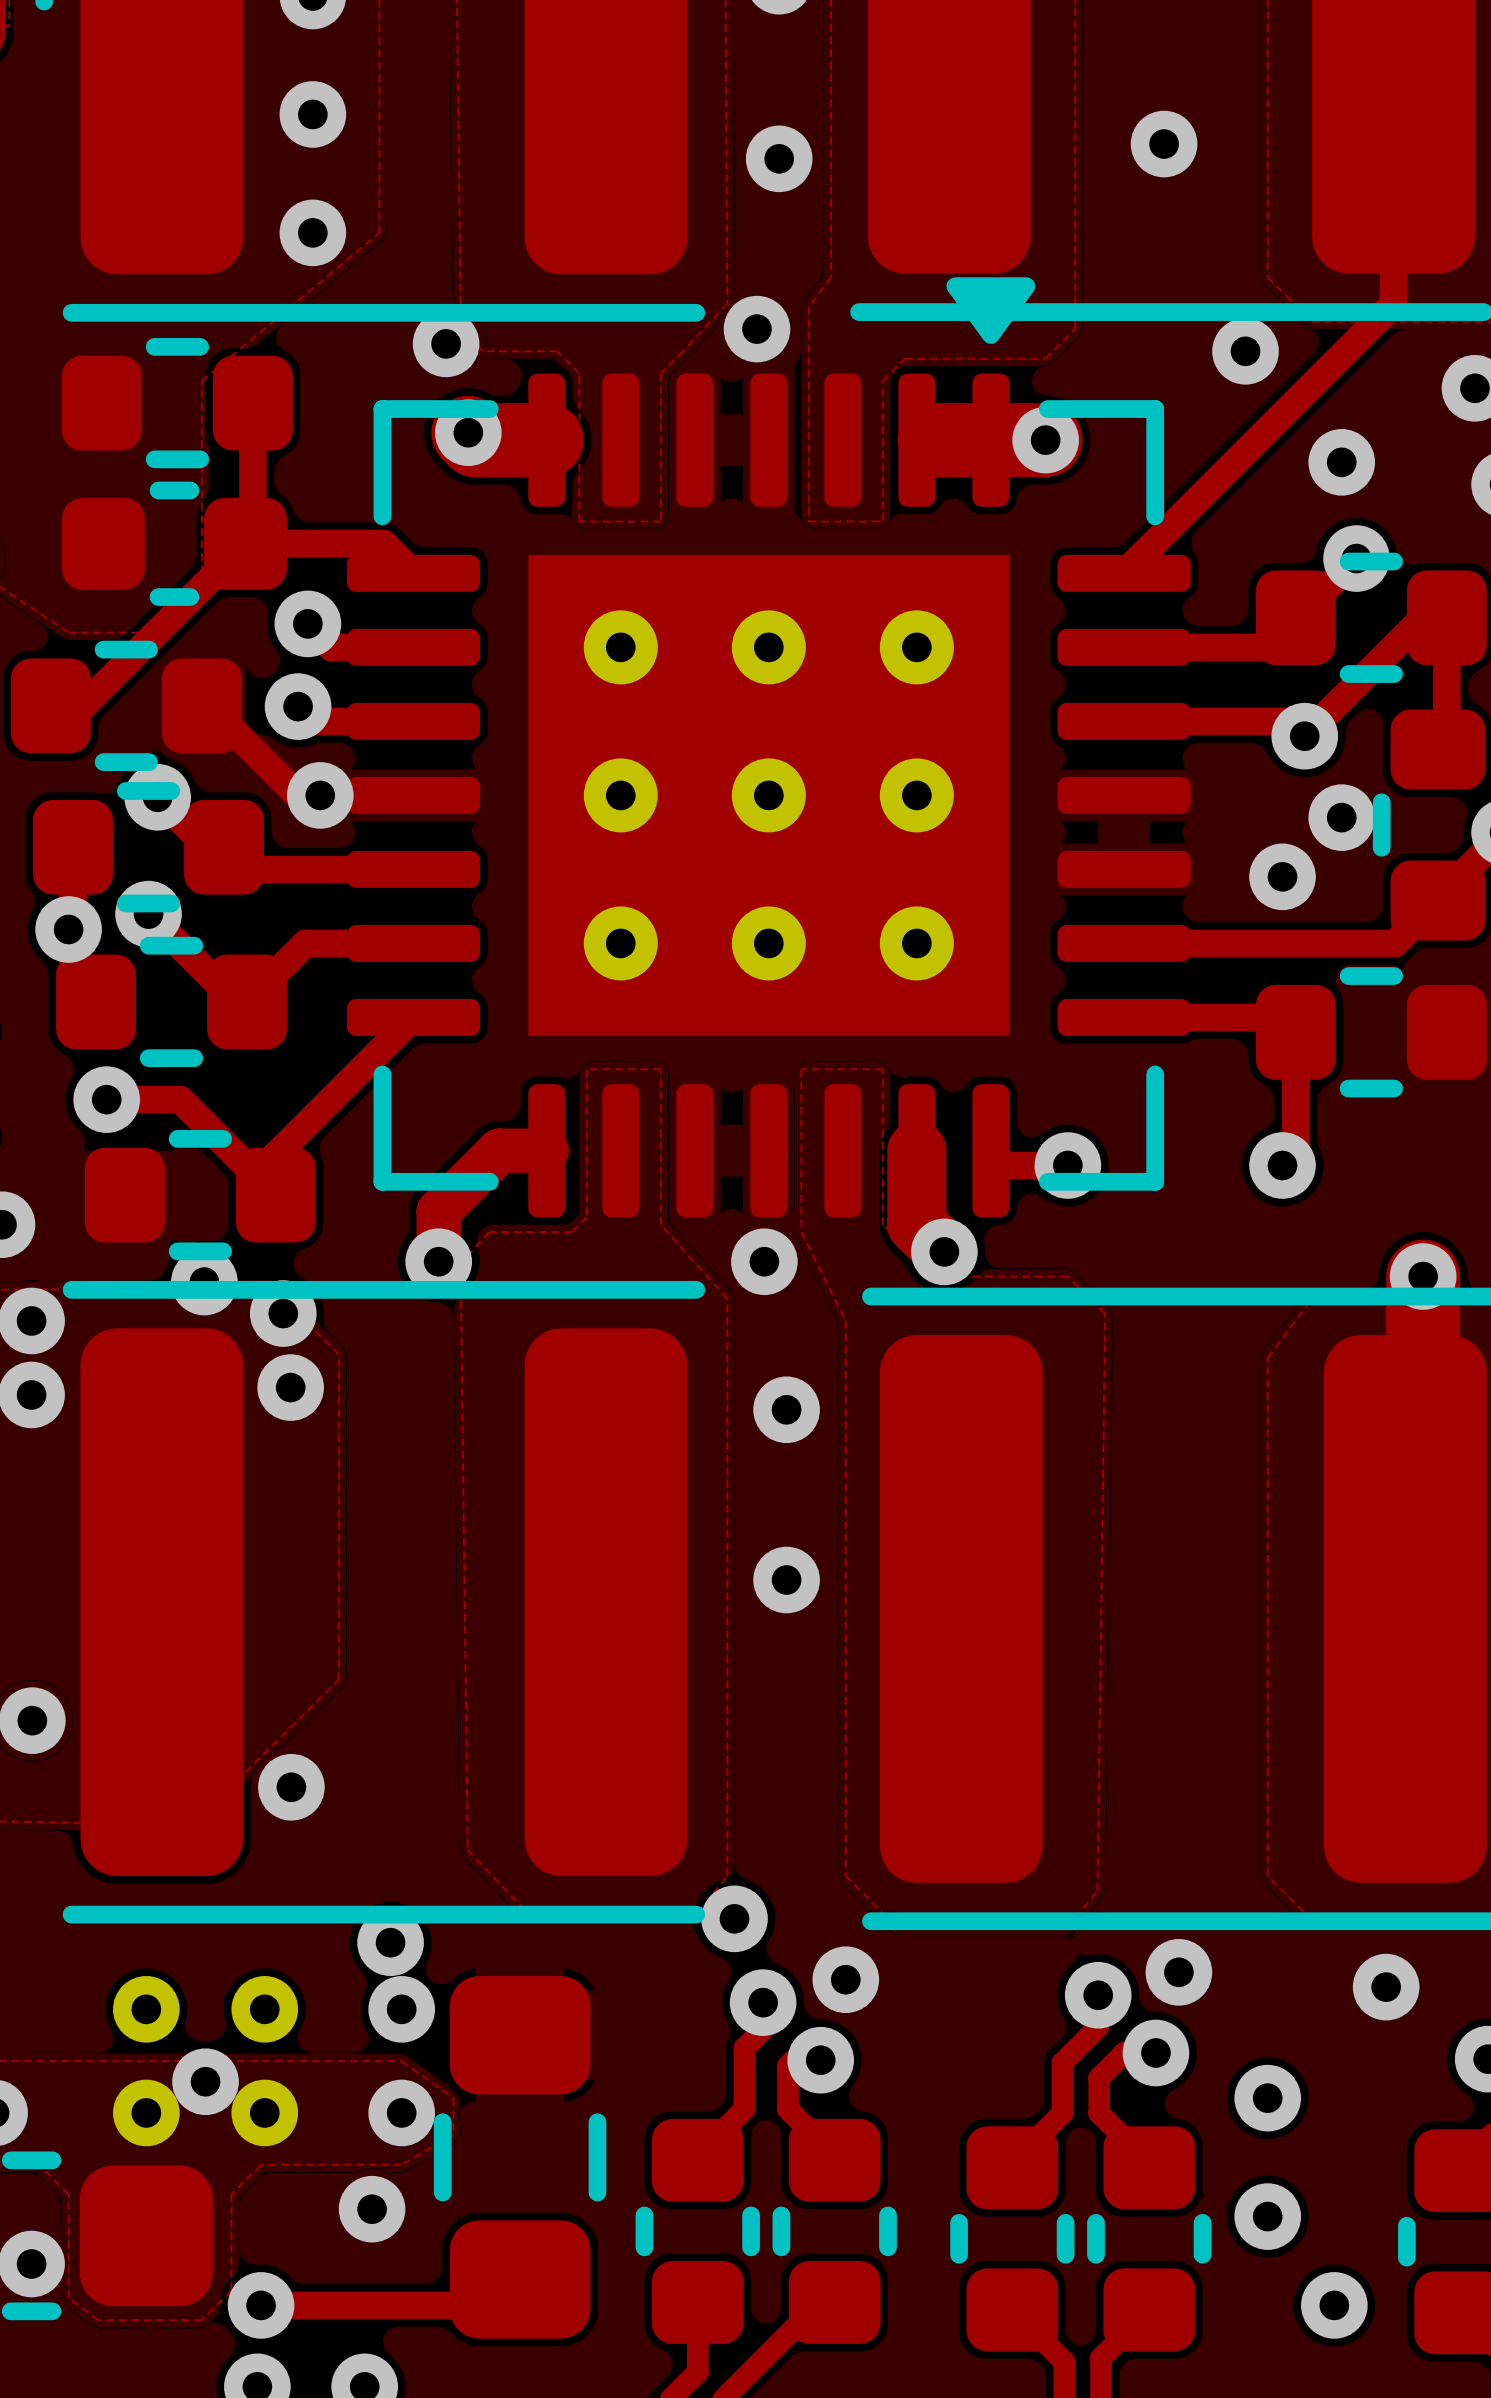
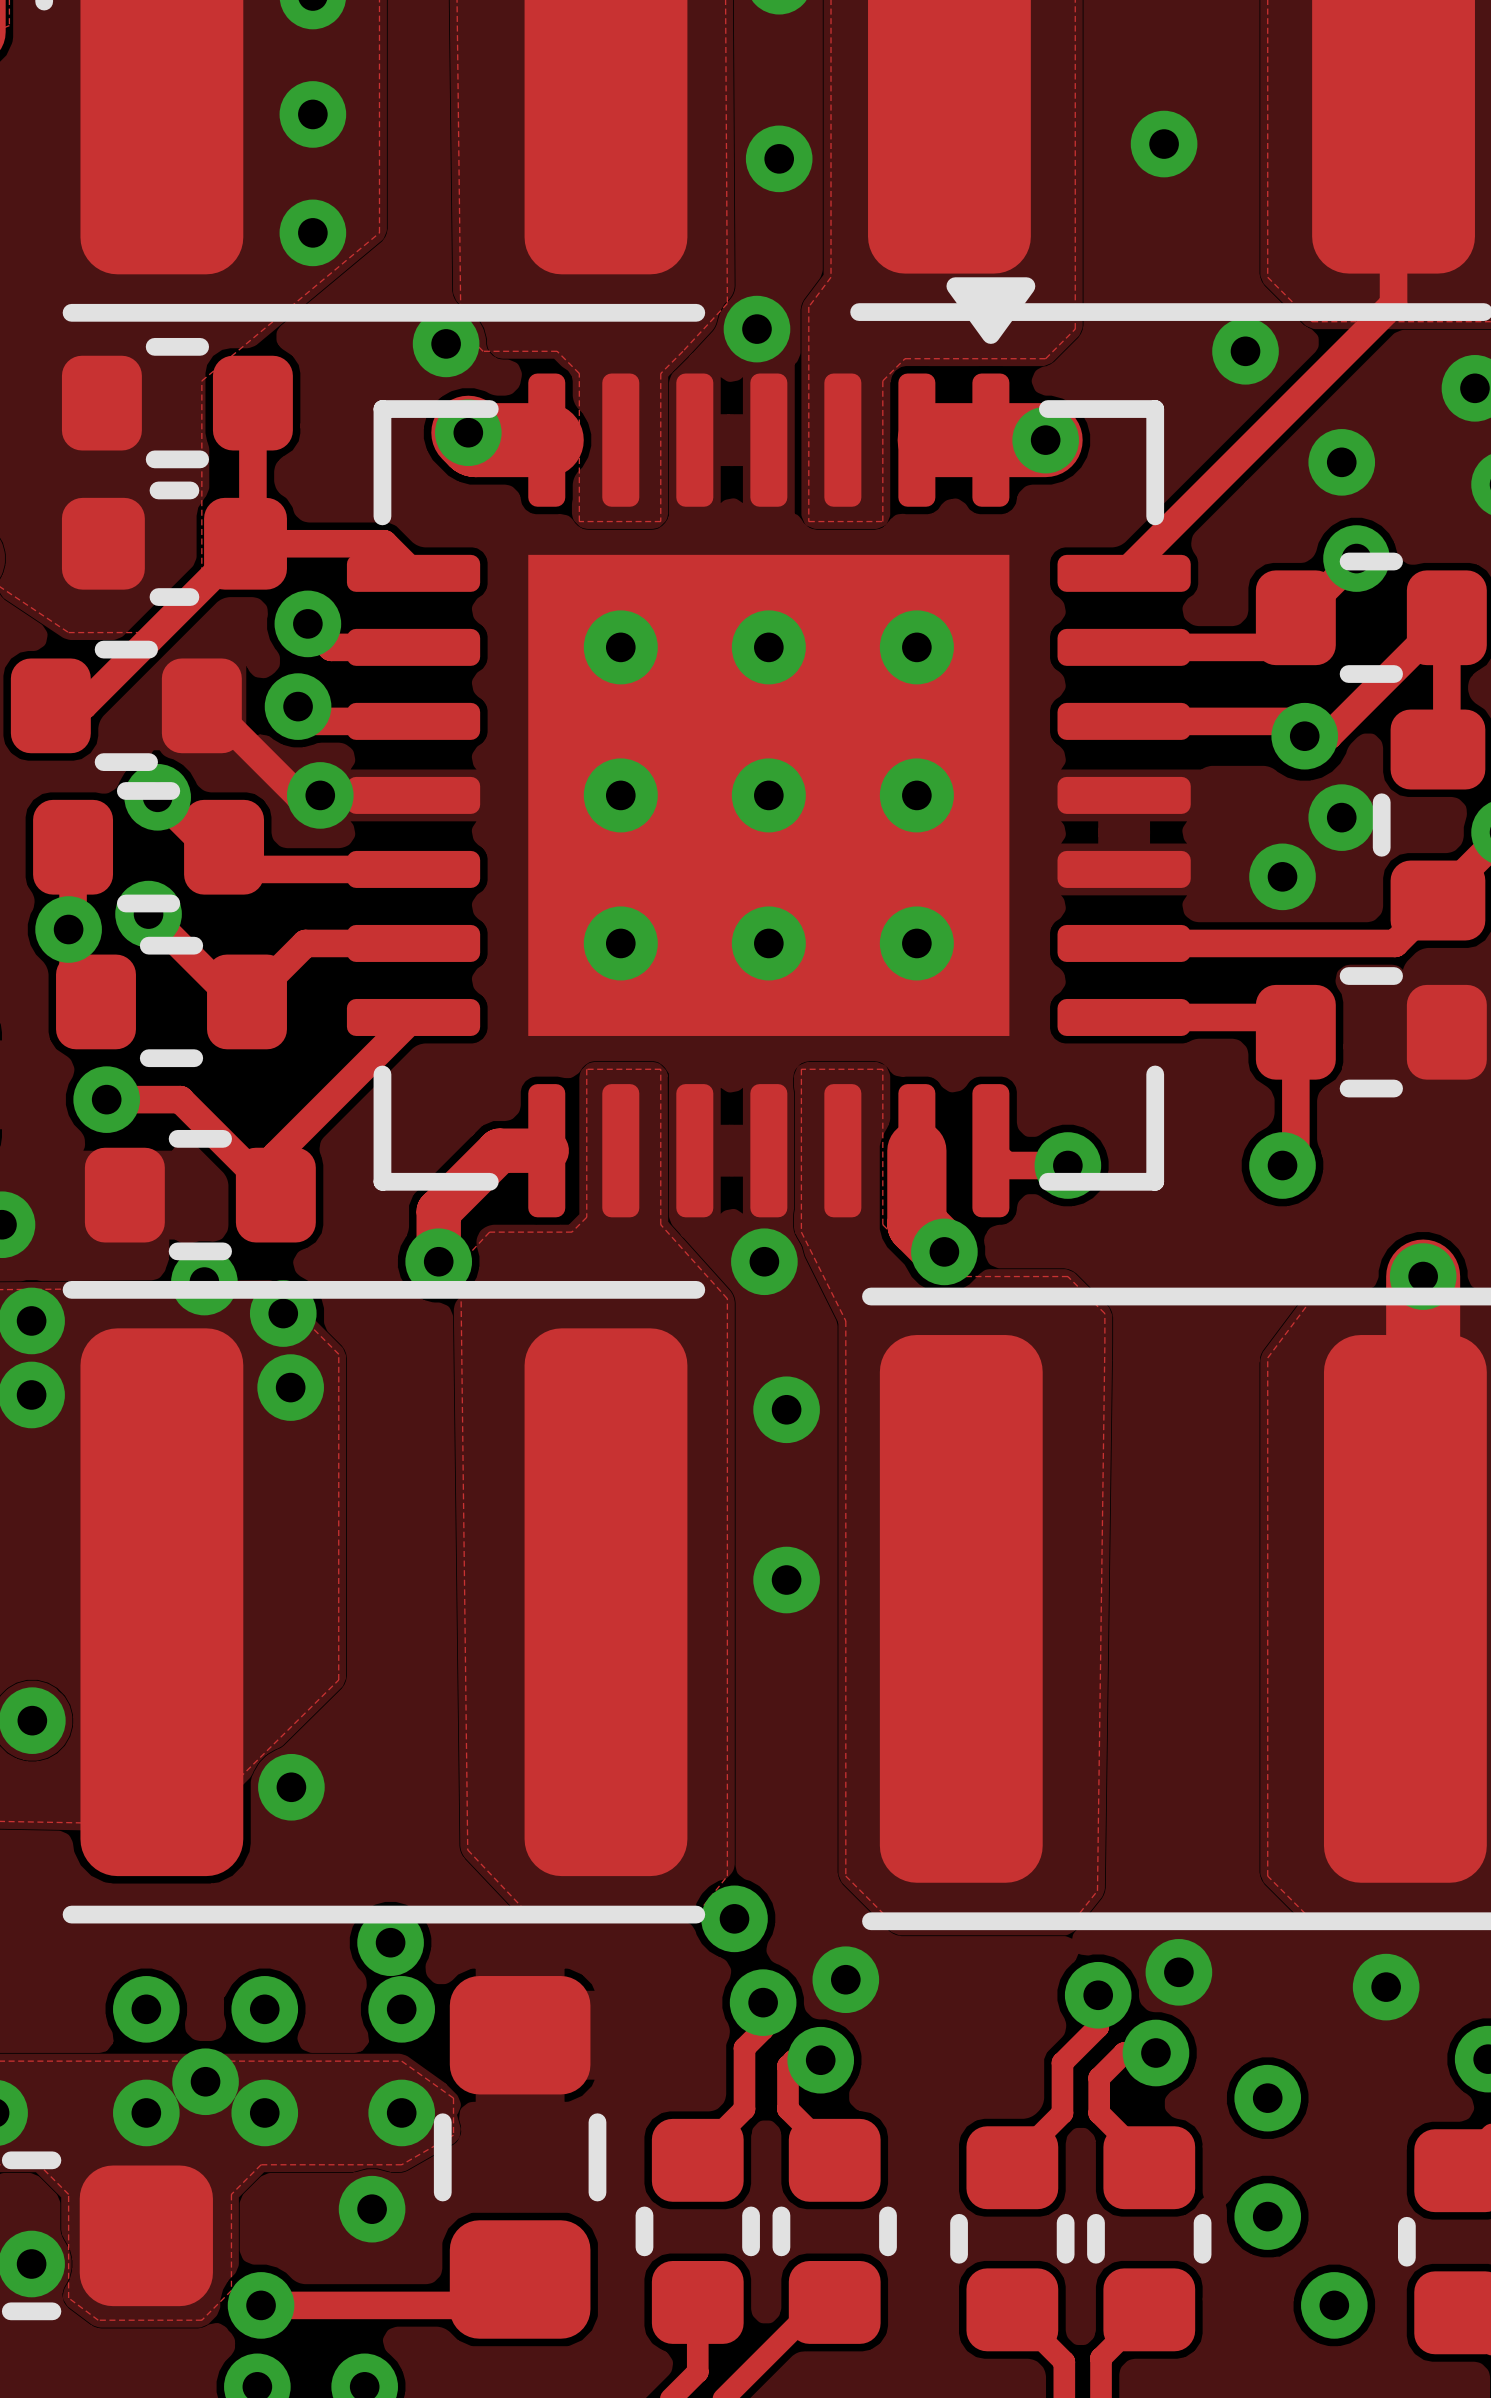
track: (1446, 617) (1423, 617) (1304, 736) -> (1446, 617) (1328, 736) (1304, 736)

